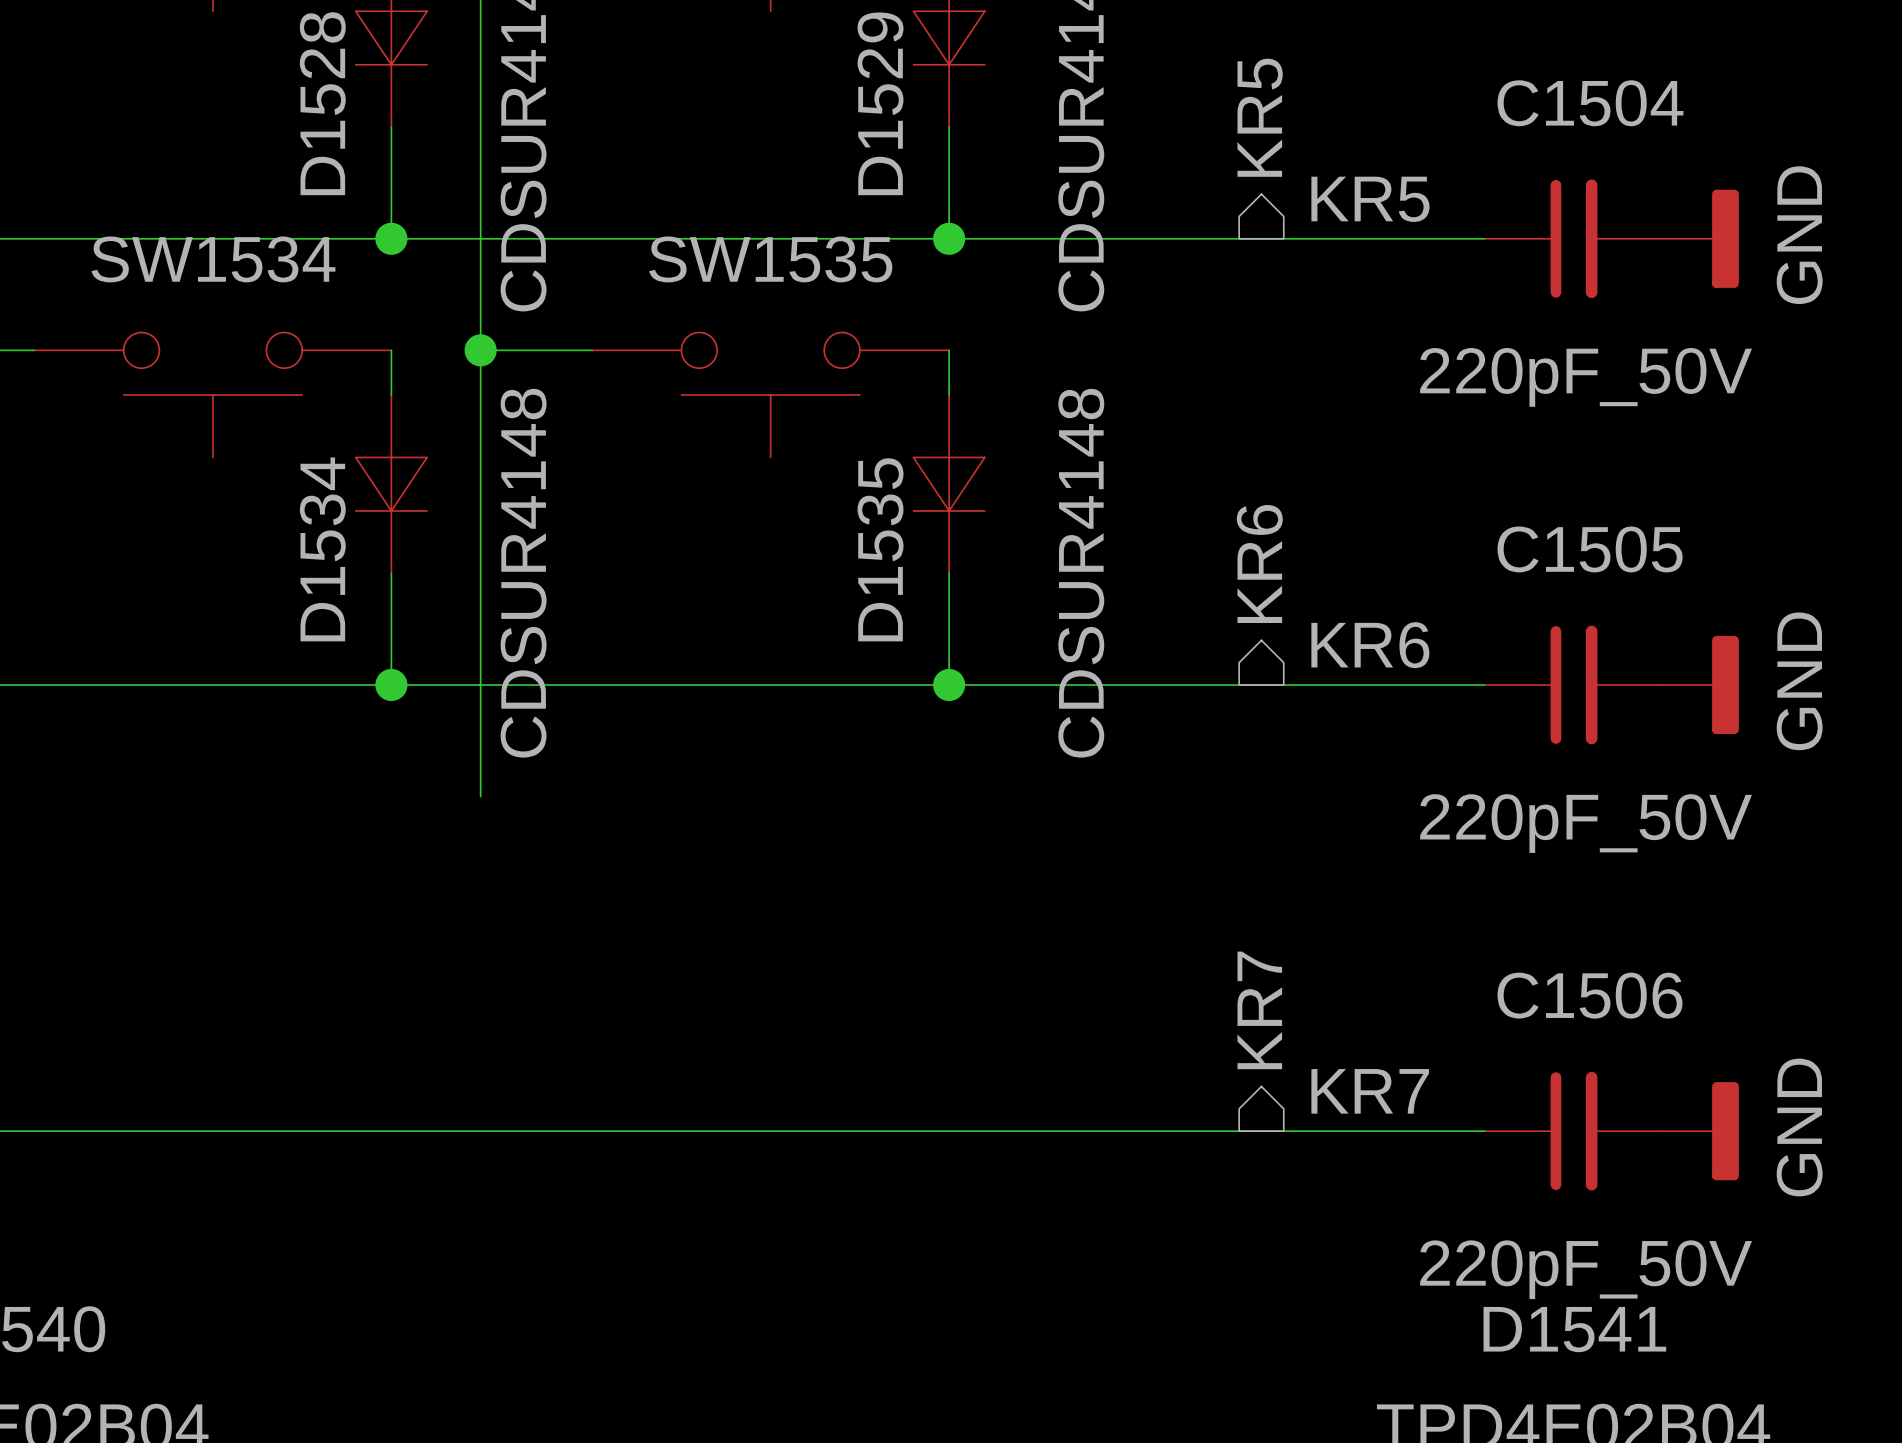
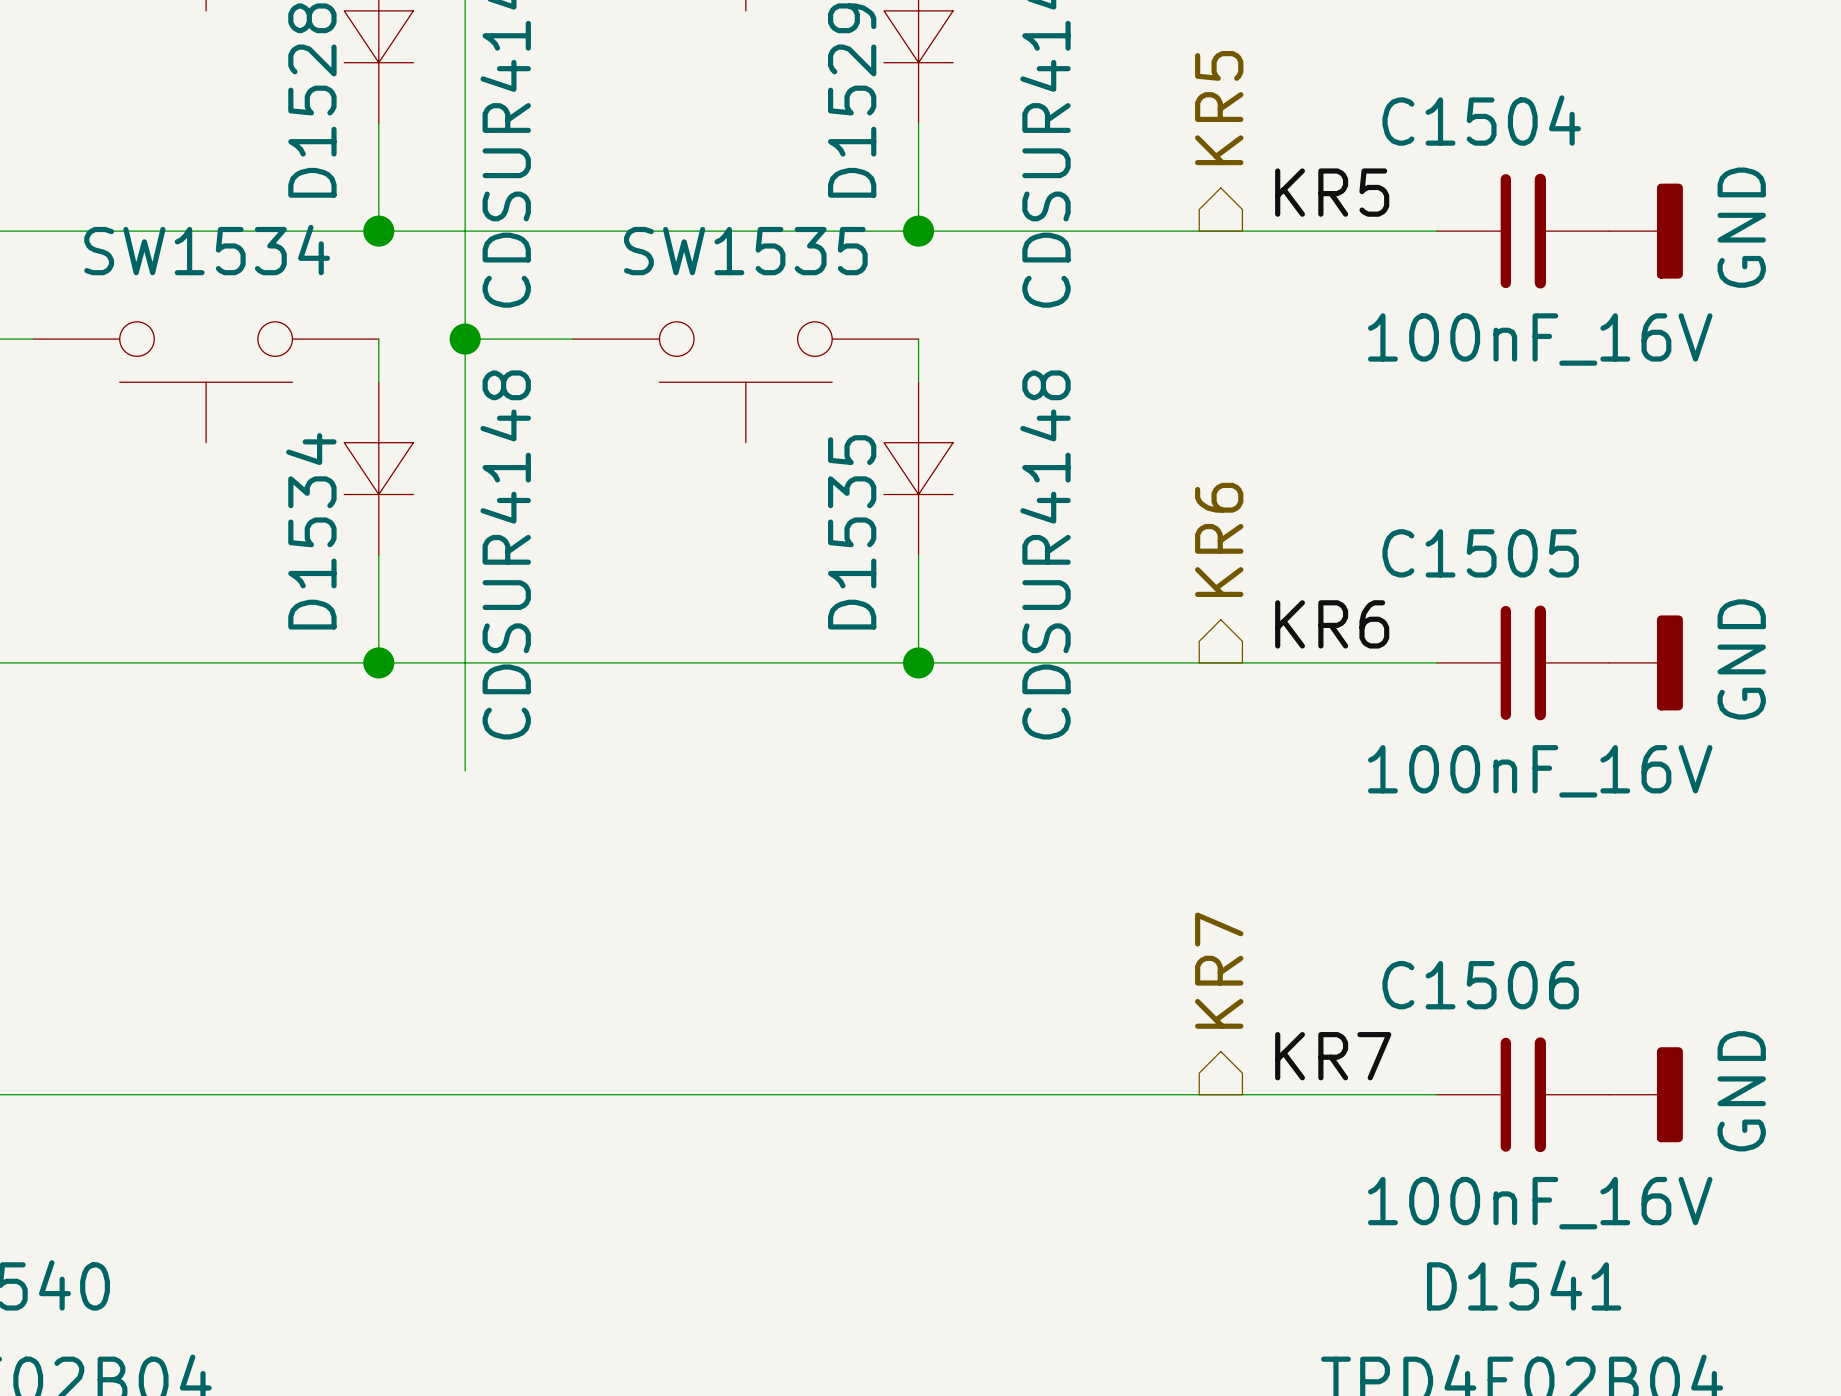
C1504 name position: C1504 (1590, 103) -> C1504 (1481, 120)
C1504 value: 220pF_50V (1586, 377) -> 100nF_16V (1540, 339)
C1505 name position: C1505 (1590, 549) -> C1505 (1480, 553)
C1505 value: 220pF_50V (1586, 823) -> 100nF_16V (1540, 771)
C1506 name position: C1506 (1589, 995) -> C1506 (1480, 985)
C1506 value: 220pF_50V (1586, 1269) -> 100nF_16V (1540, 1203)

